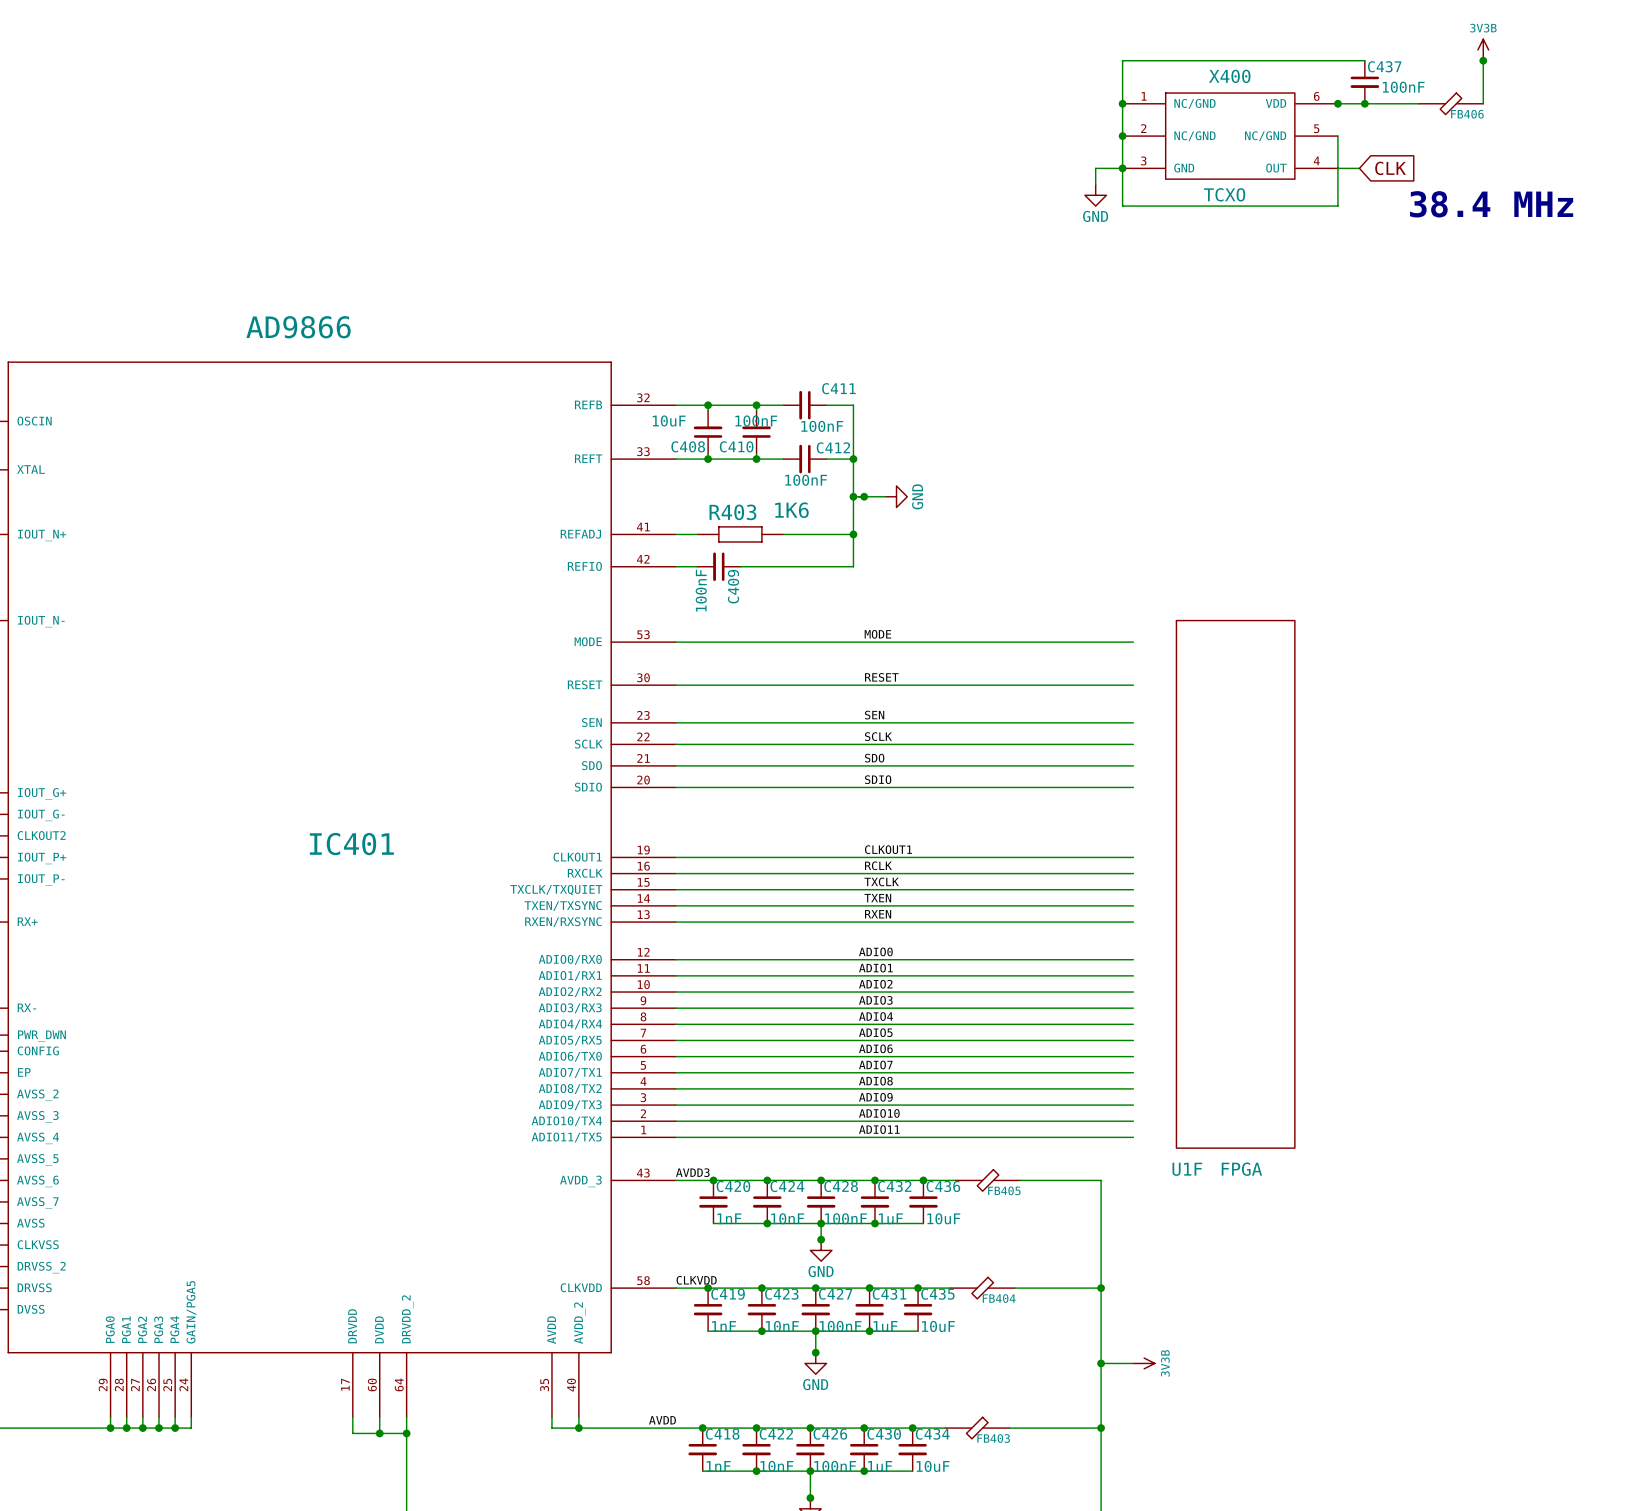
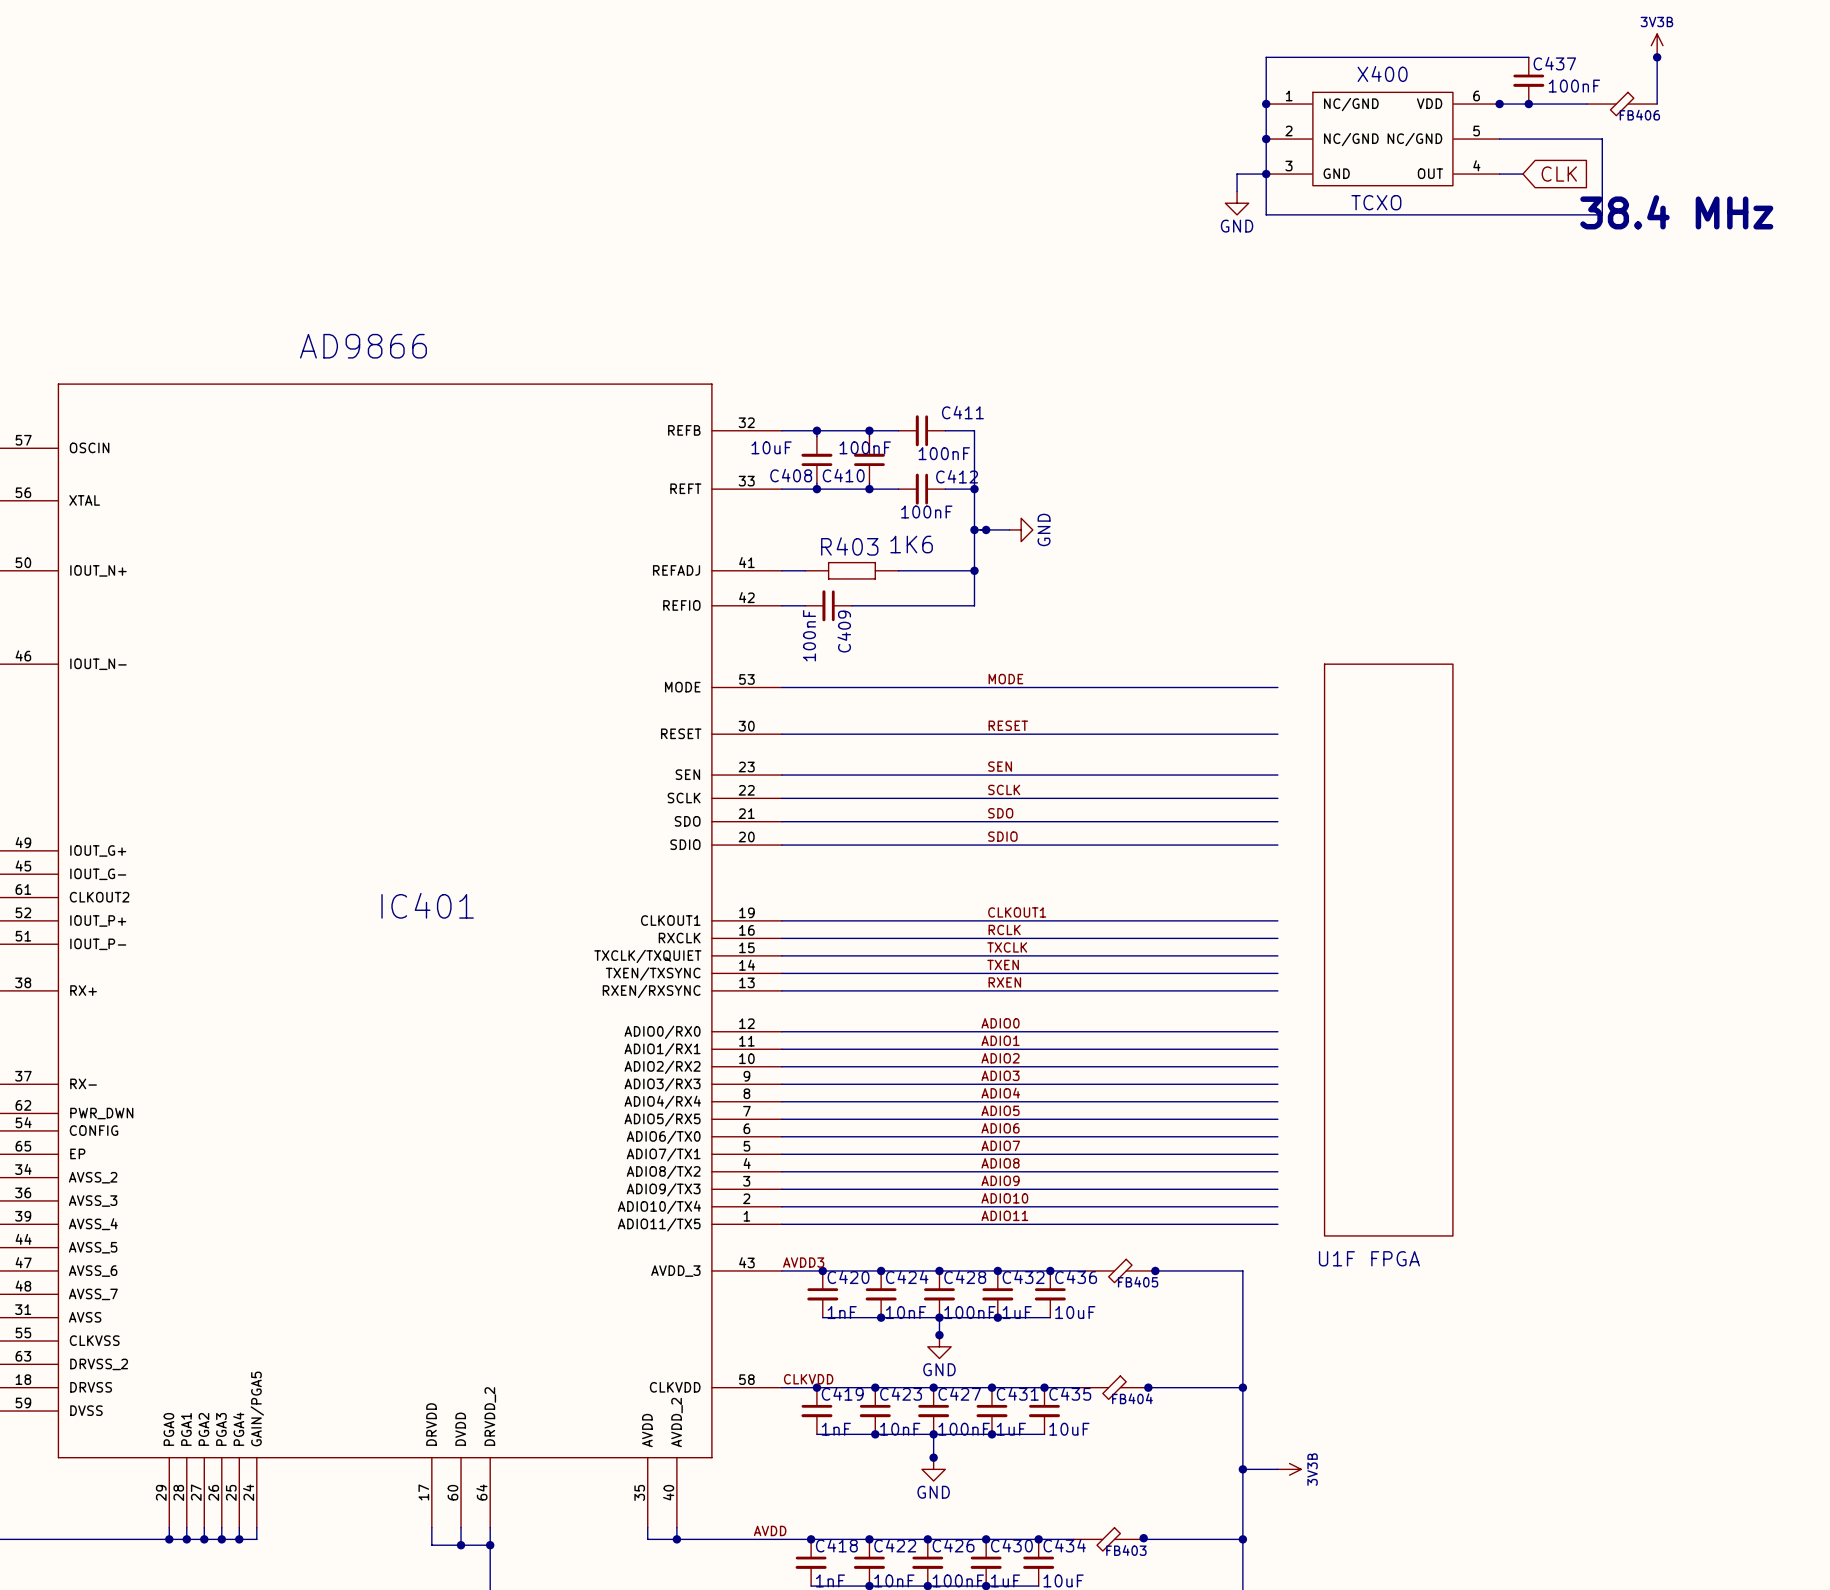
wire: (1337, 136) (1337, 206) -> (1499, 139) (1602, 139) (1602, 214) (1499, 214)
junction: none -> (1155, 1270)
junction: none -> (1148, 1387)
junction: none -> (1143, 1538)

